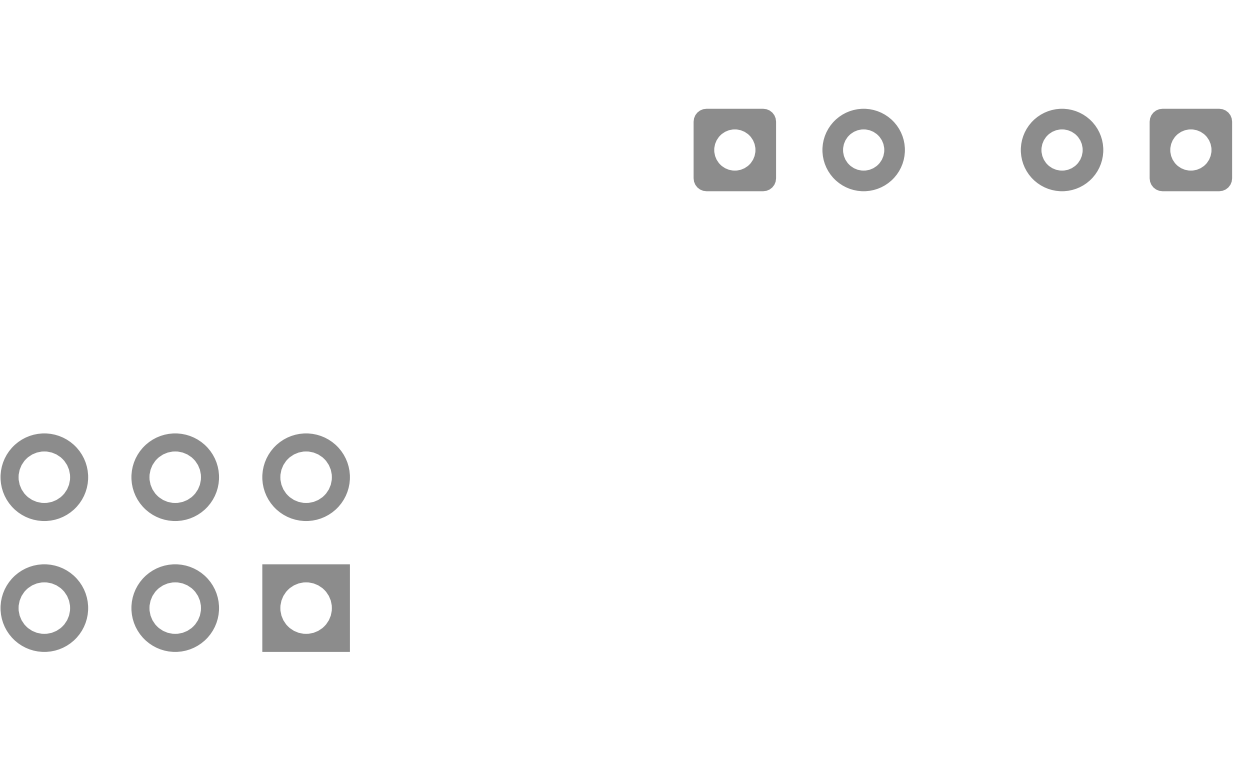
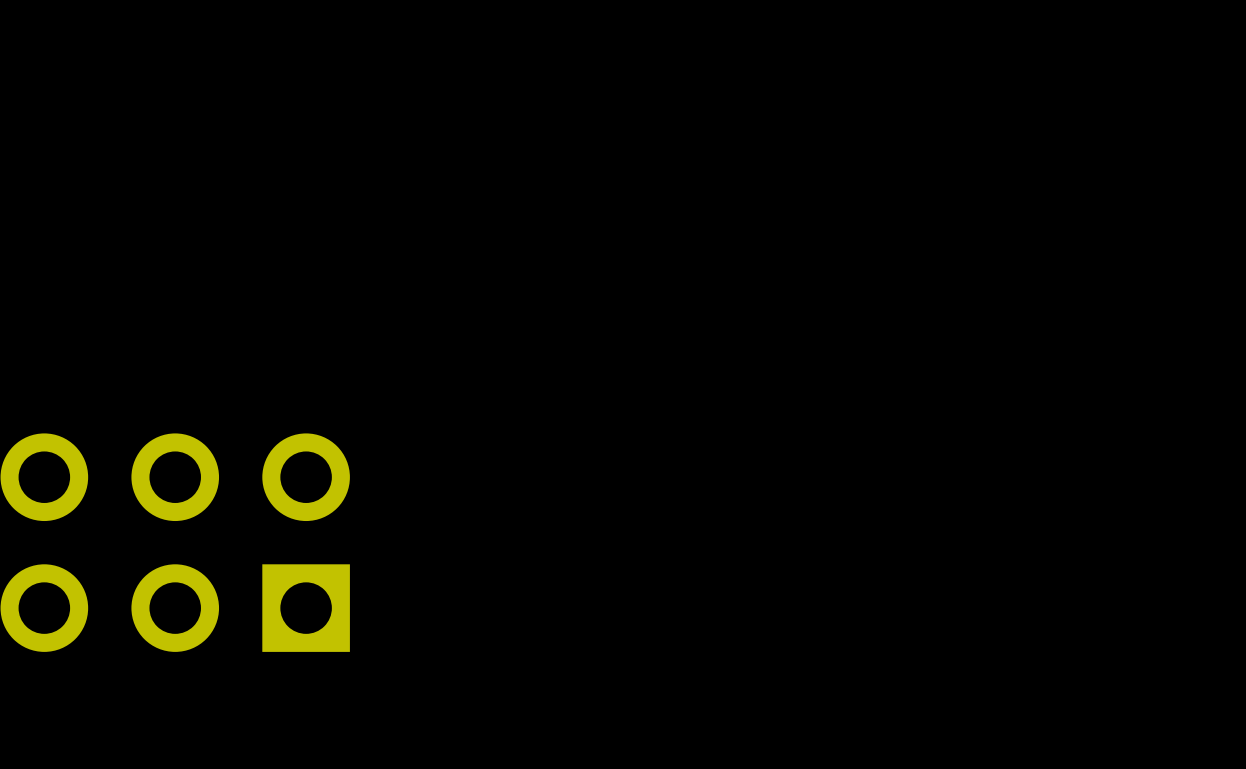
part: (799, 150) -> none
part: (1126, 150) -> none

